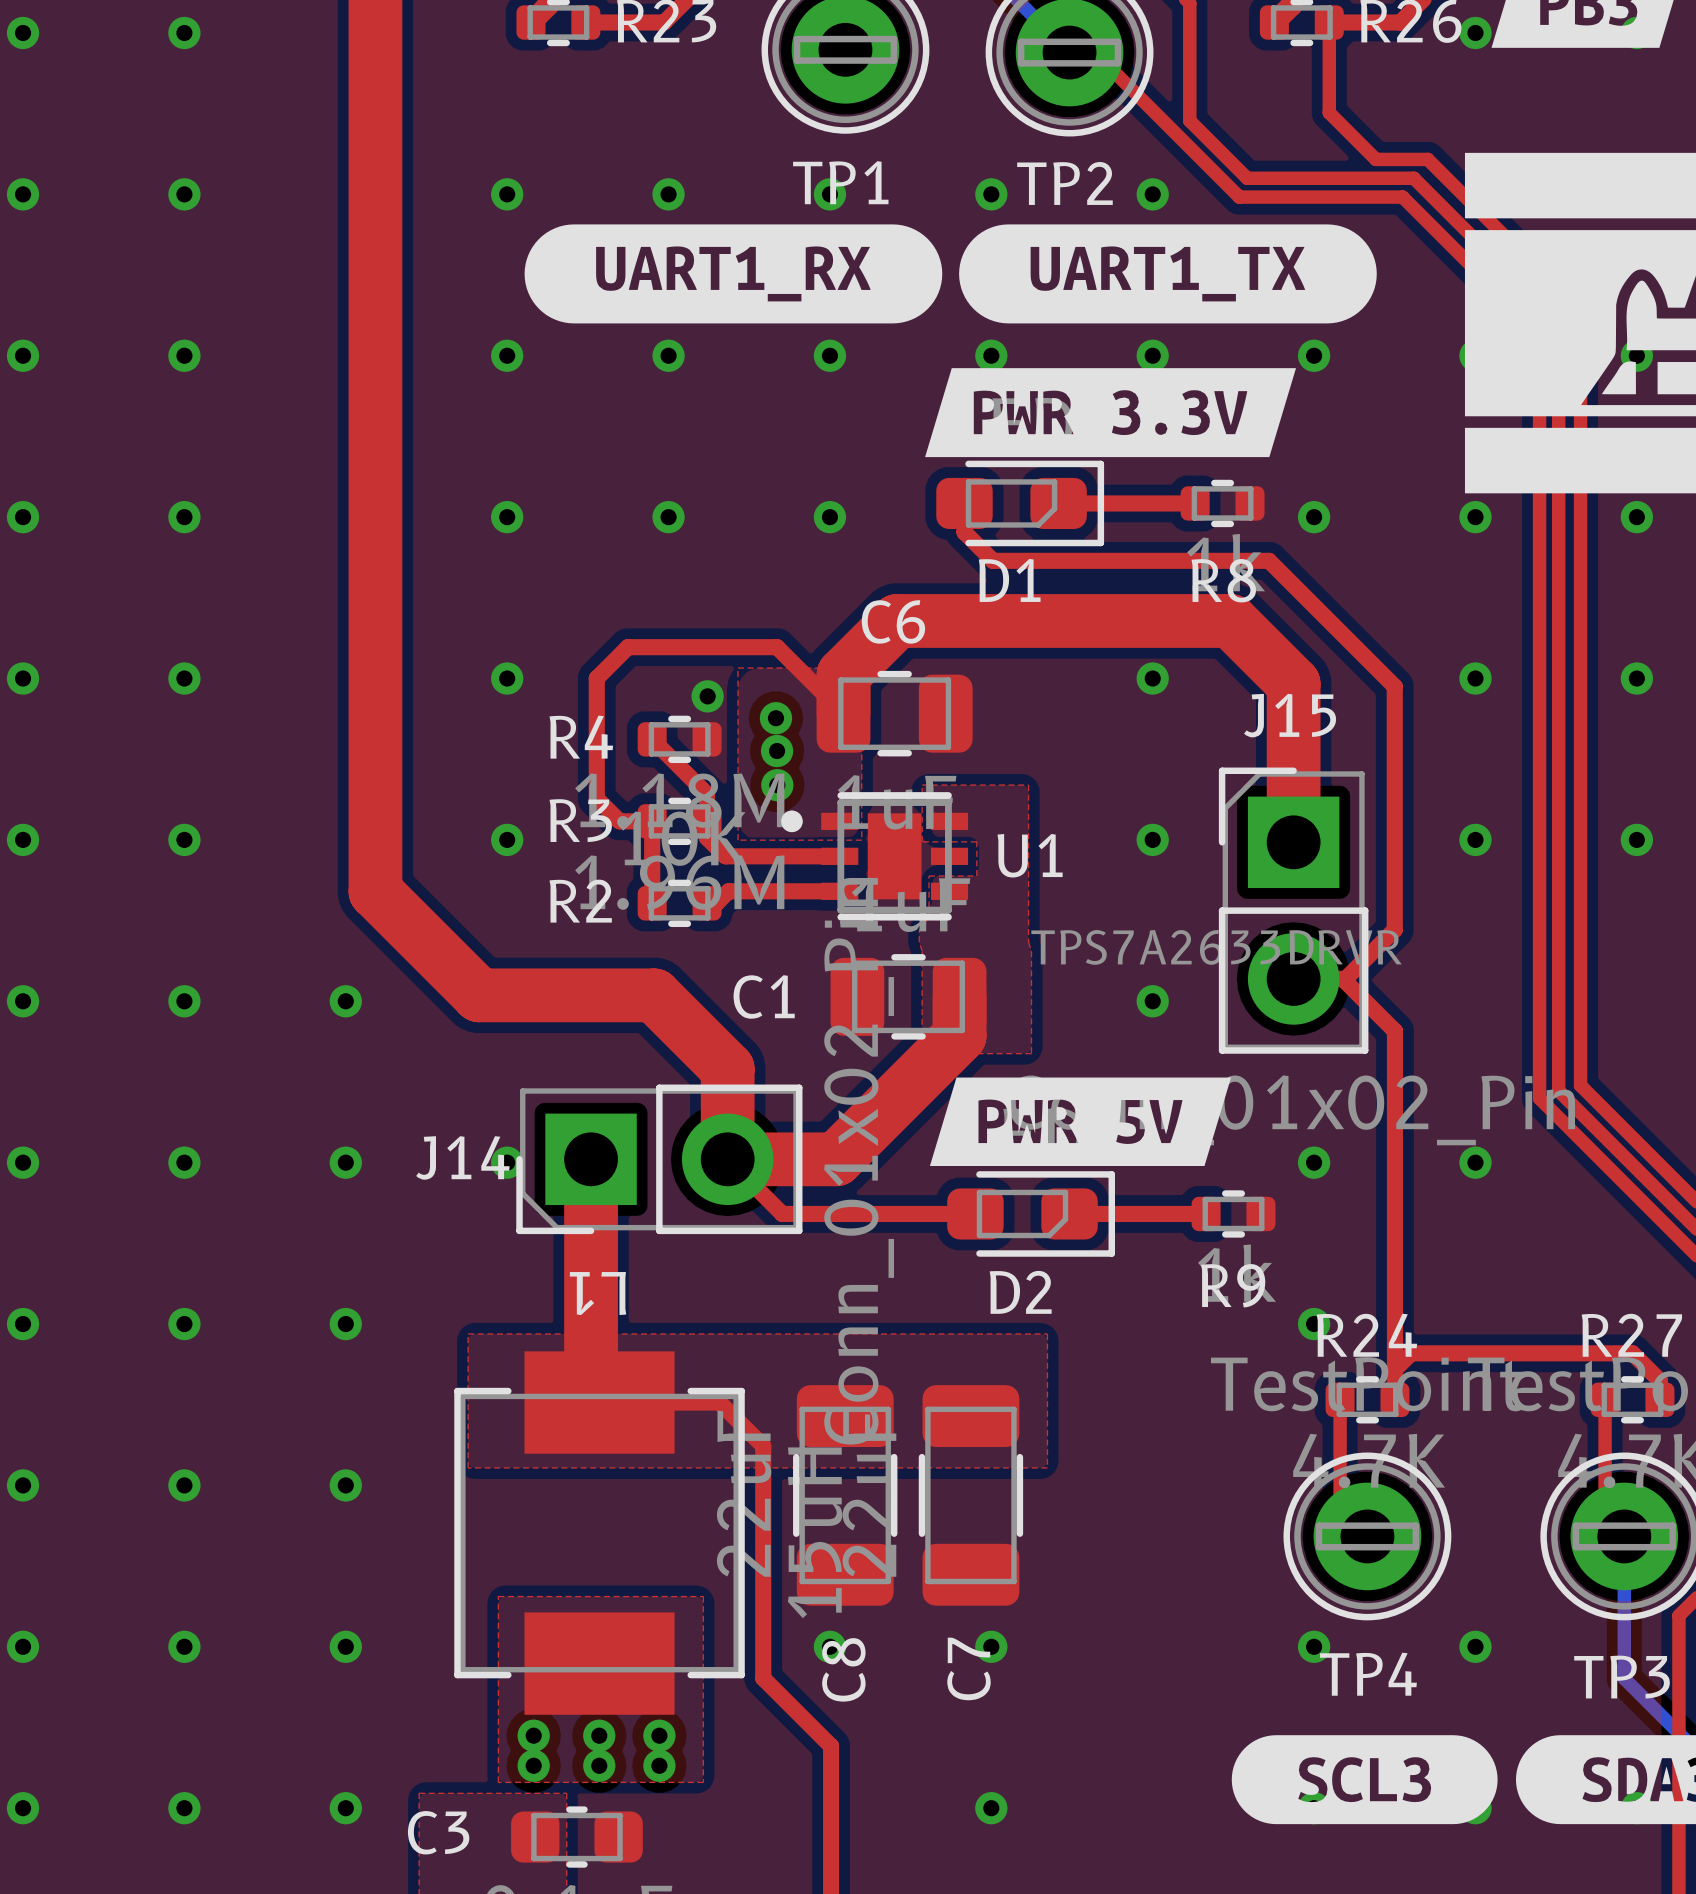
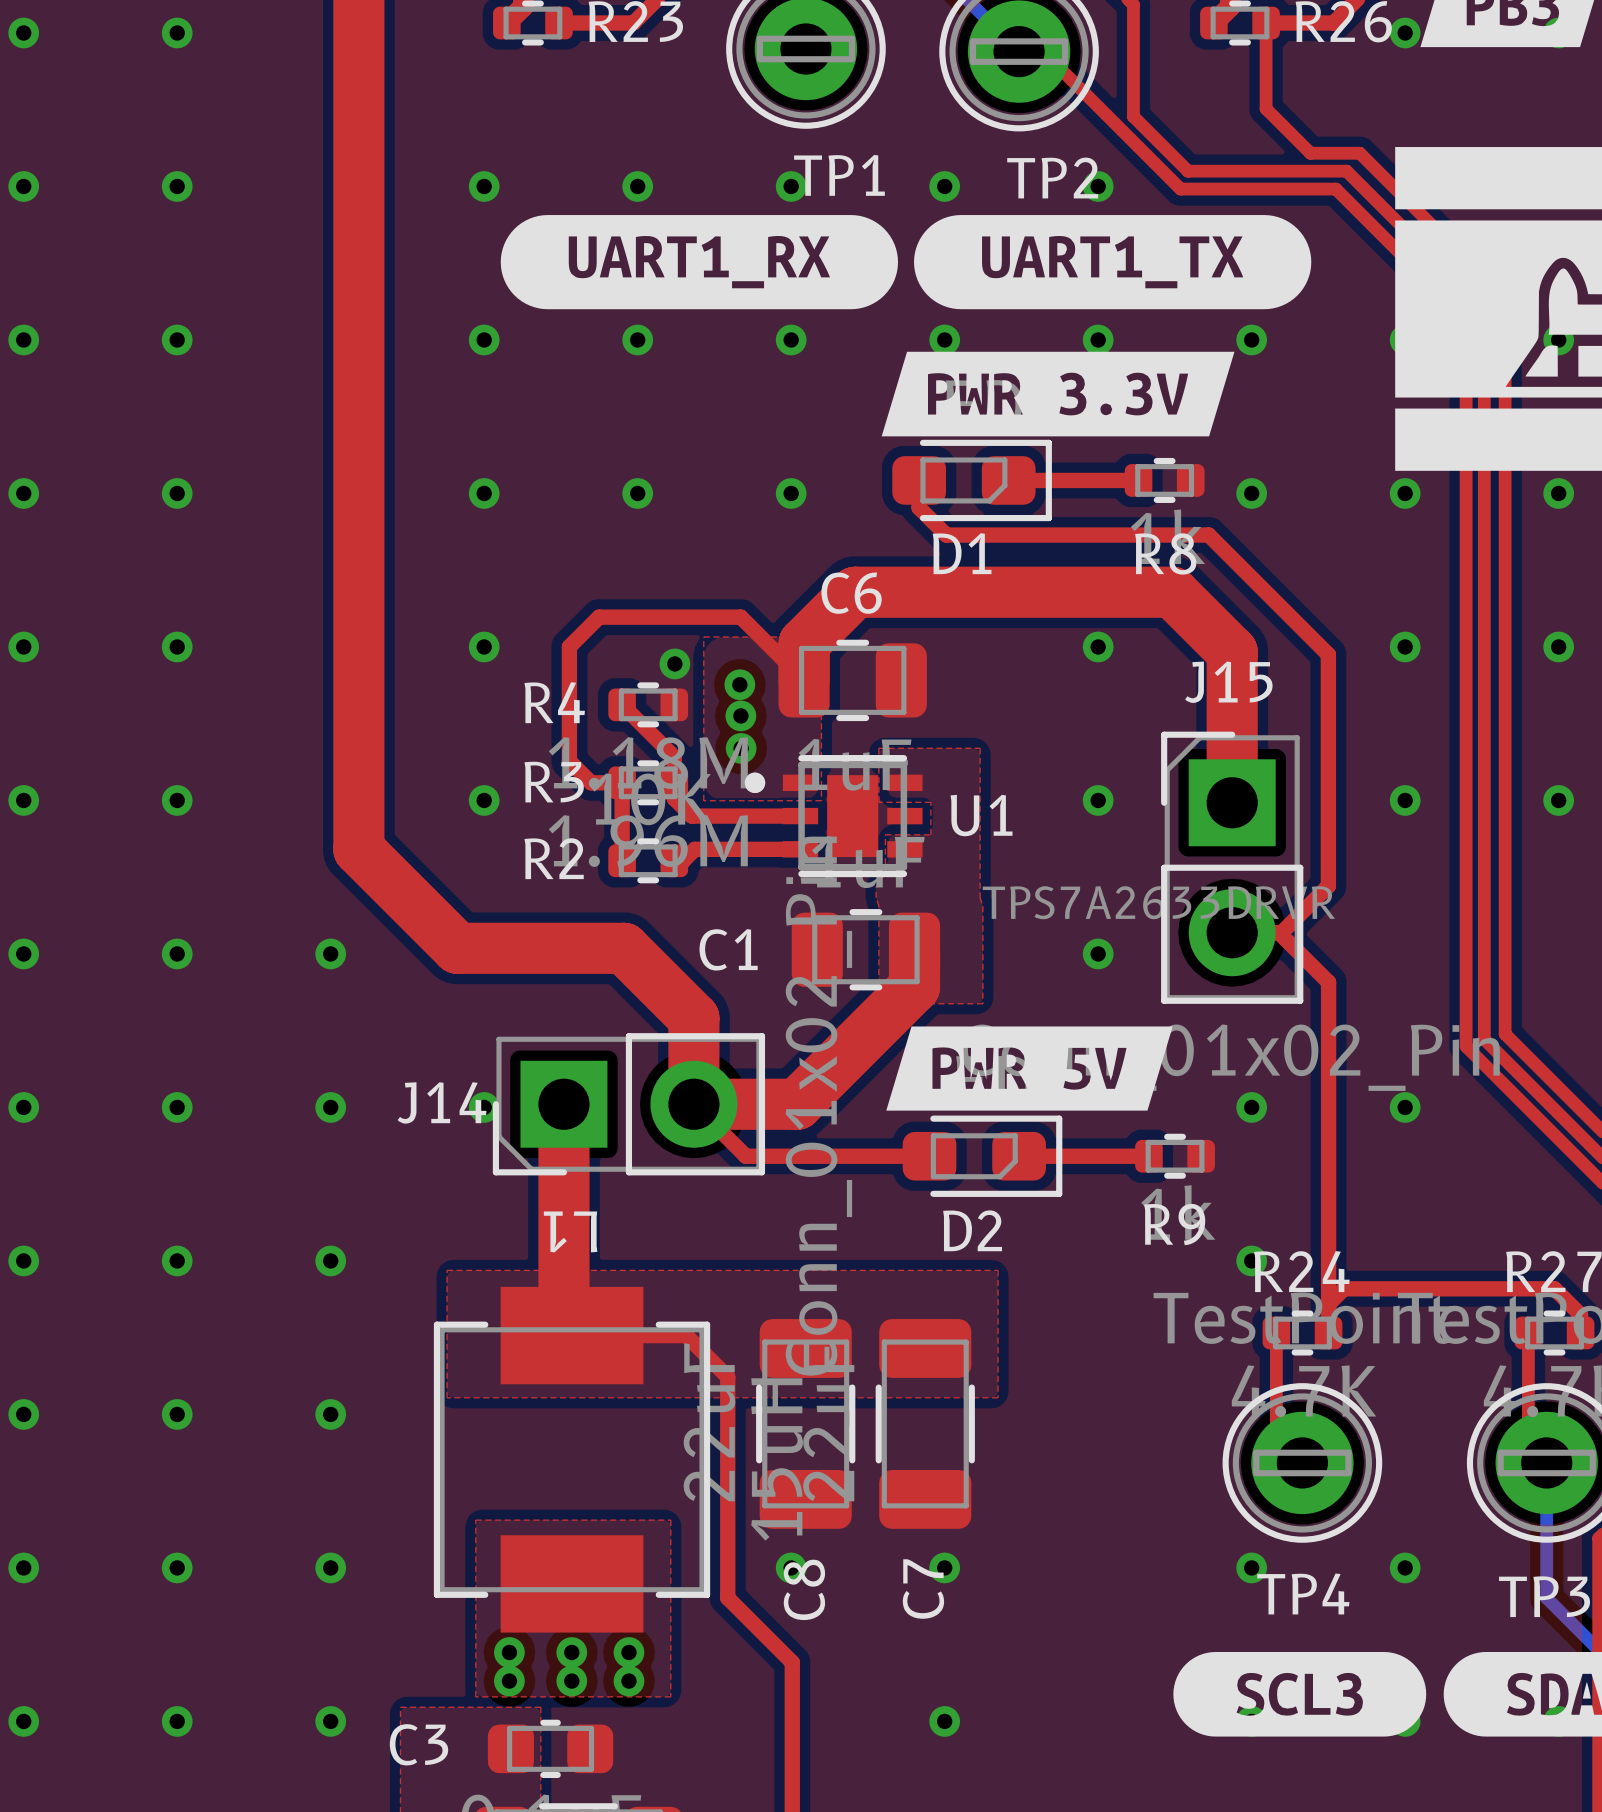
TP1 name position: TP1 (840, 182) -> TP1 (839, 175)
TP2 name position: TP2 (1064, 183) -> TP2 (1052, 178)

